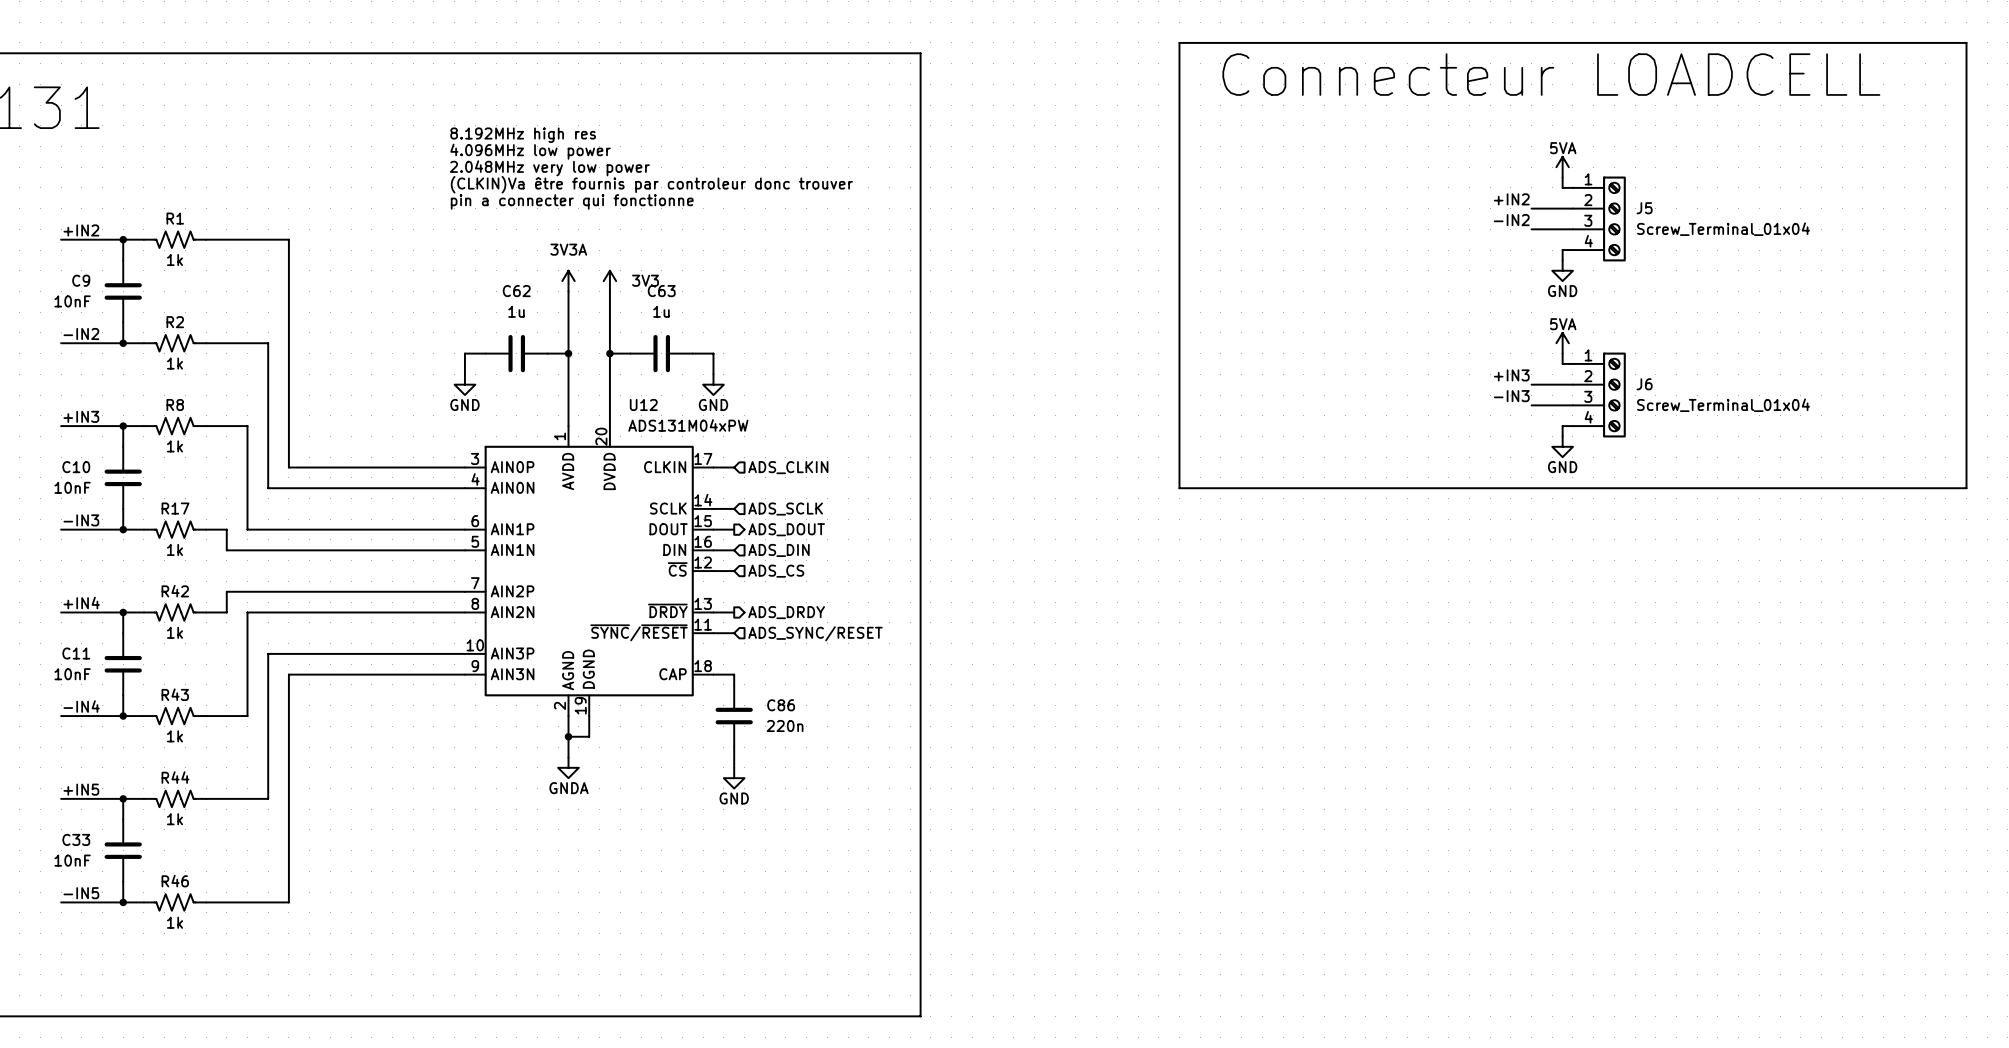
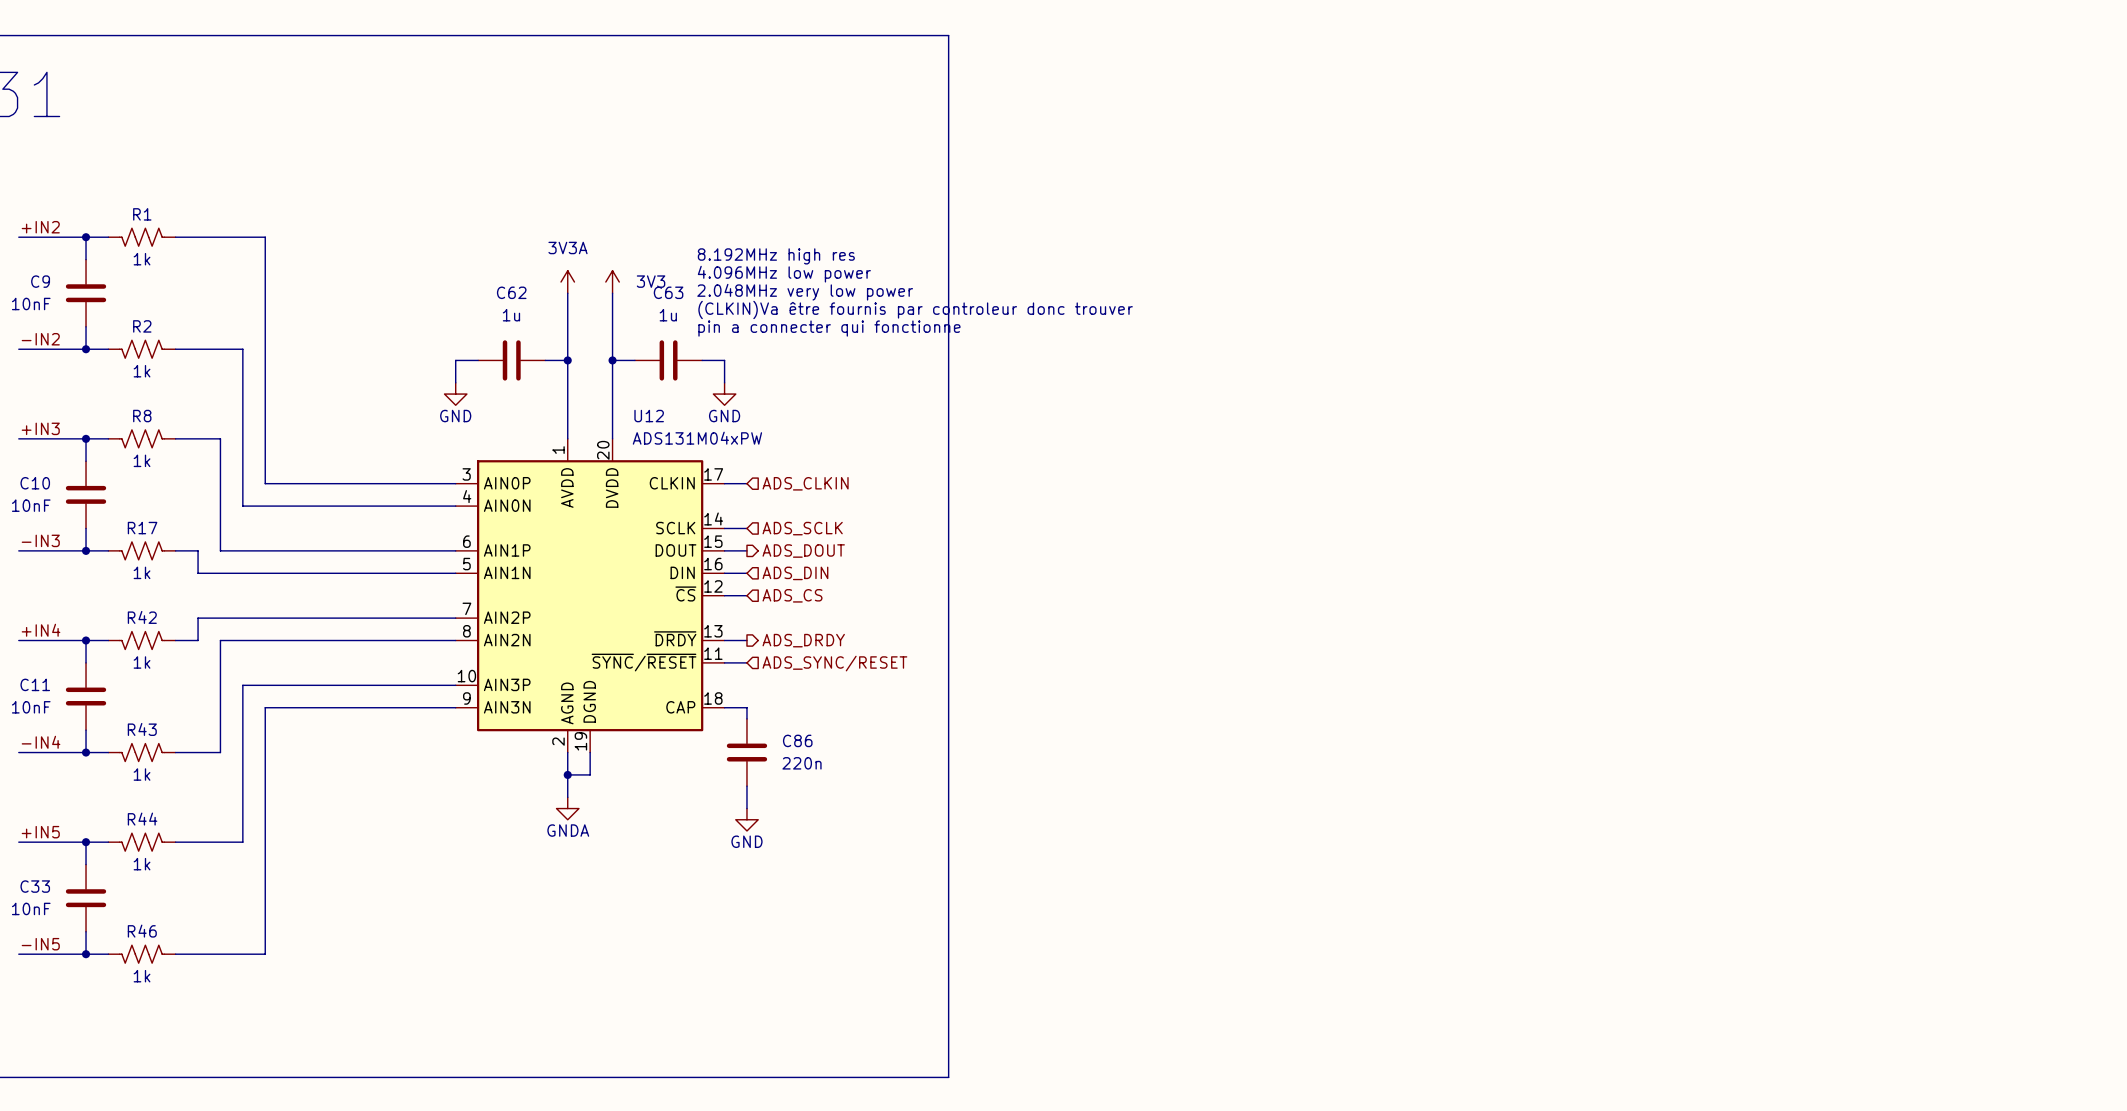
line: (1179, 42) (1966, 42) (1966, 488) (1179, 488) (1179, 42) -> none
text: Connecteur LOADCELL (1551, 74) -> none
text: 8.192MHz high res (523, 135) -> none
text: 4.096MHz low power (530, 151) -> none
power symbol: 5VA (1562, 167) -> none
text: 2.048MHz very low power (549, 168) -> none
wire: (1562, 177) (1562, 187) (1572, 187) -> none
text: (CLKIN)Va être fournis par controleur donc trouver (651, 184) -> none
label: +IN2 (1511, 199) -> none
text: pin a connecter qui fonctionne (572, 201) -> none
wire: (1531, 208) (1572, 208) -> none
J5: Screw_Terminal_01x04 (1599, 218) -> none
label: -IN2 (1511, 220) -> none
wire: (1531, 229) (1572, 229) -> none
wire: (1572, 250) (1562, 250) (1562, 260) -> none
text: none -> 8.192MHz high res (776, 256)
power symbol: GND (1562, 270) -> none
text: none -> 4.096MHz low power (784, 274)
text: none -> 2.048MHz very low power (805, 292)
text: none -> (CLKIN)Va être fournis par controleur donc trouver (915, 309)
text: none -> pin a connecter qui fonctionne (829, 328)
power symbol: 5VA (1562, 343) -> none
wire: (1562, 353) (1562, 363) (1572, 363) -> none
label: +IN3 (1511, 375) -> none
wire: (1531, 384) (1572, 384) -> none
J6: Screw_Terminal_01x04 (1599, 395) -> none
label: -IN3 (1511, 396) -> none
wire: (1531, 405) (1572, 405) -> none
wire: (1572, 426) (1562, 426) (1562, 436) -> none
power symbol: GND (1562, 446) -> none

